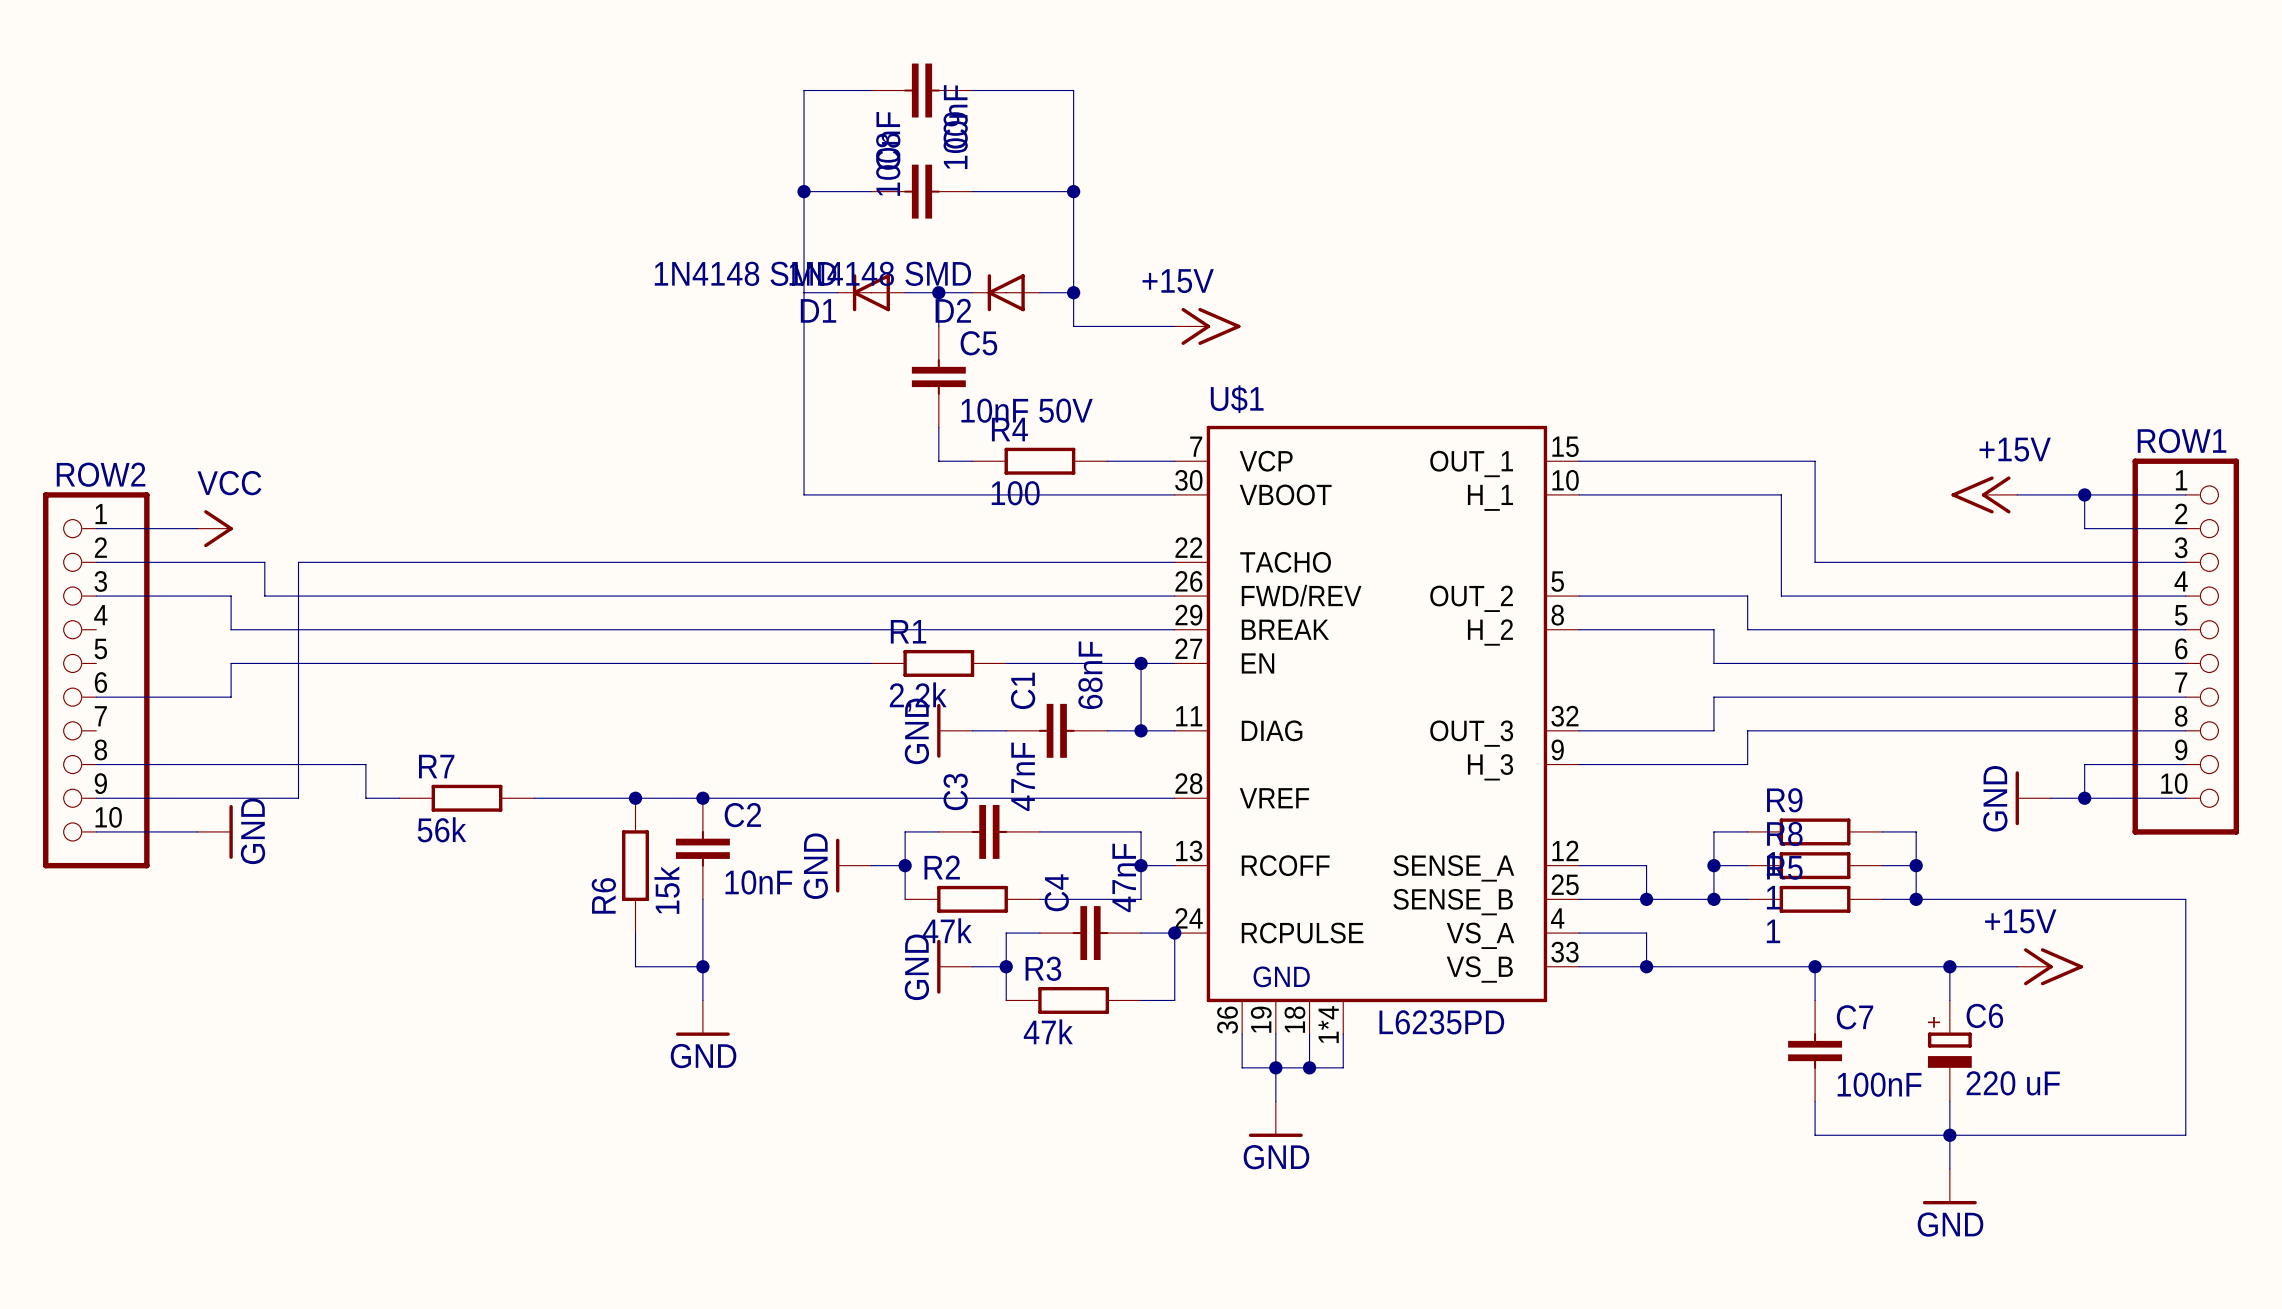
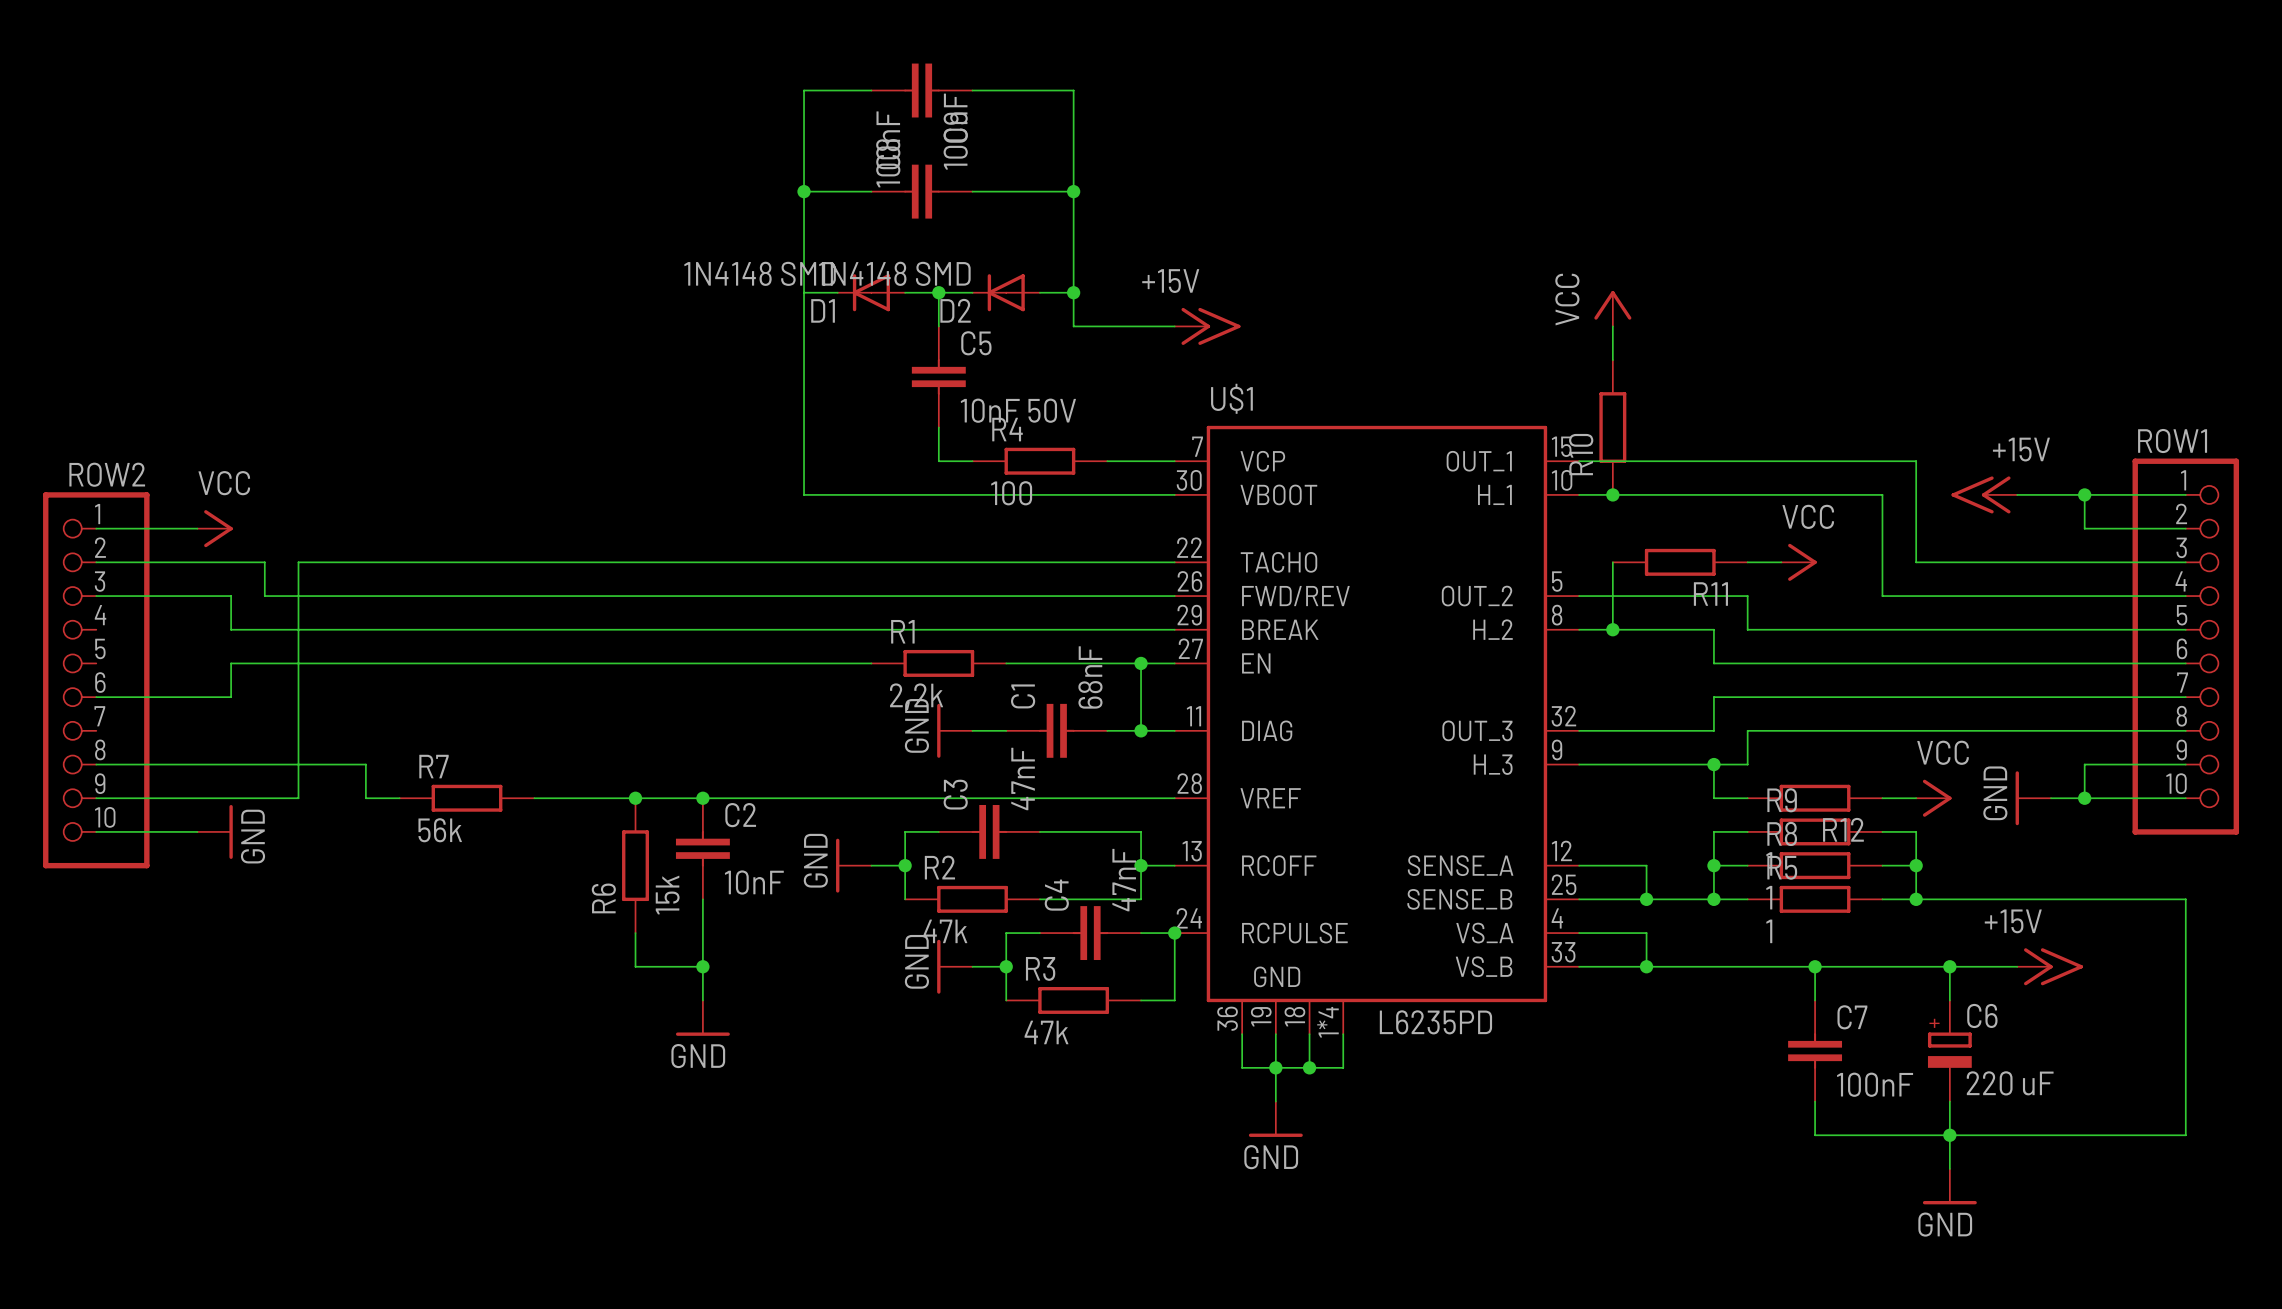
power symbol: none -> VCC (1612, 308)
wire: none -> (1612, 326) (1612, 360)
R10: none -> (1612, 427)
wire: (1815, 461) (1815, 562) (1916, 562) -> (1815, 461) (1916, 461) (1916, 562)
junction: none -> (1612, 494)
wire: (1781, 494) (1781, 596) (1882, 596) -> (1781, 494) (1882, 494) (1882, 596)
wire: none -> (1612, 562) (1612, 629)
R11: none -> (1680, 562)
wire: none -> (1747, 562) (1781, 562)
power symbol: none -> VCC (1799, 562)
junction: none -> (1612, 629)
wire: none -> (1713, 764) (1713, 798) (1747, 798)
junction: none -> (1713, 764)
R12: none -> (1815, 798)
wire: none -> (1882, 798) (1916, 798)
power symbol: none -> VCC (1933, 798)

